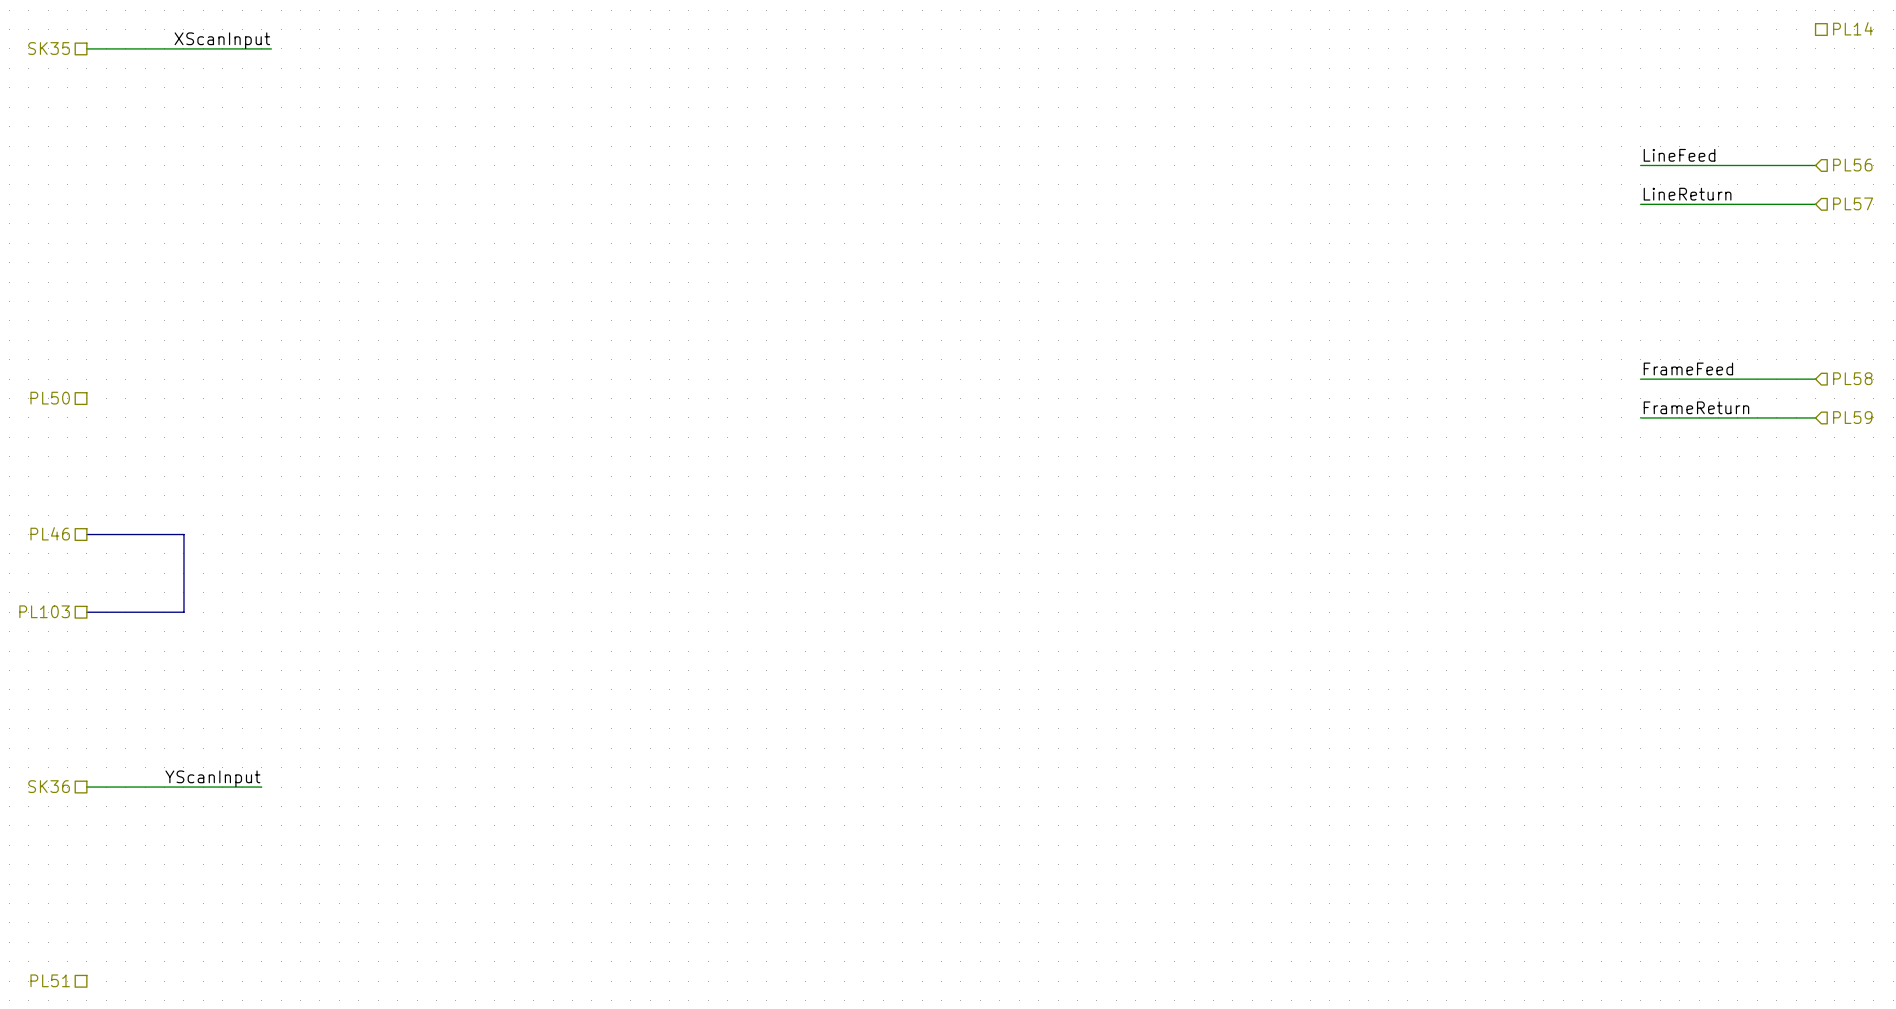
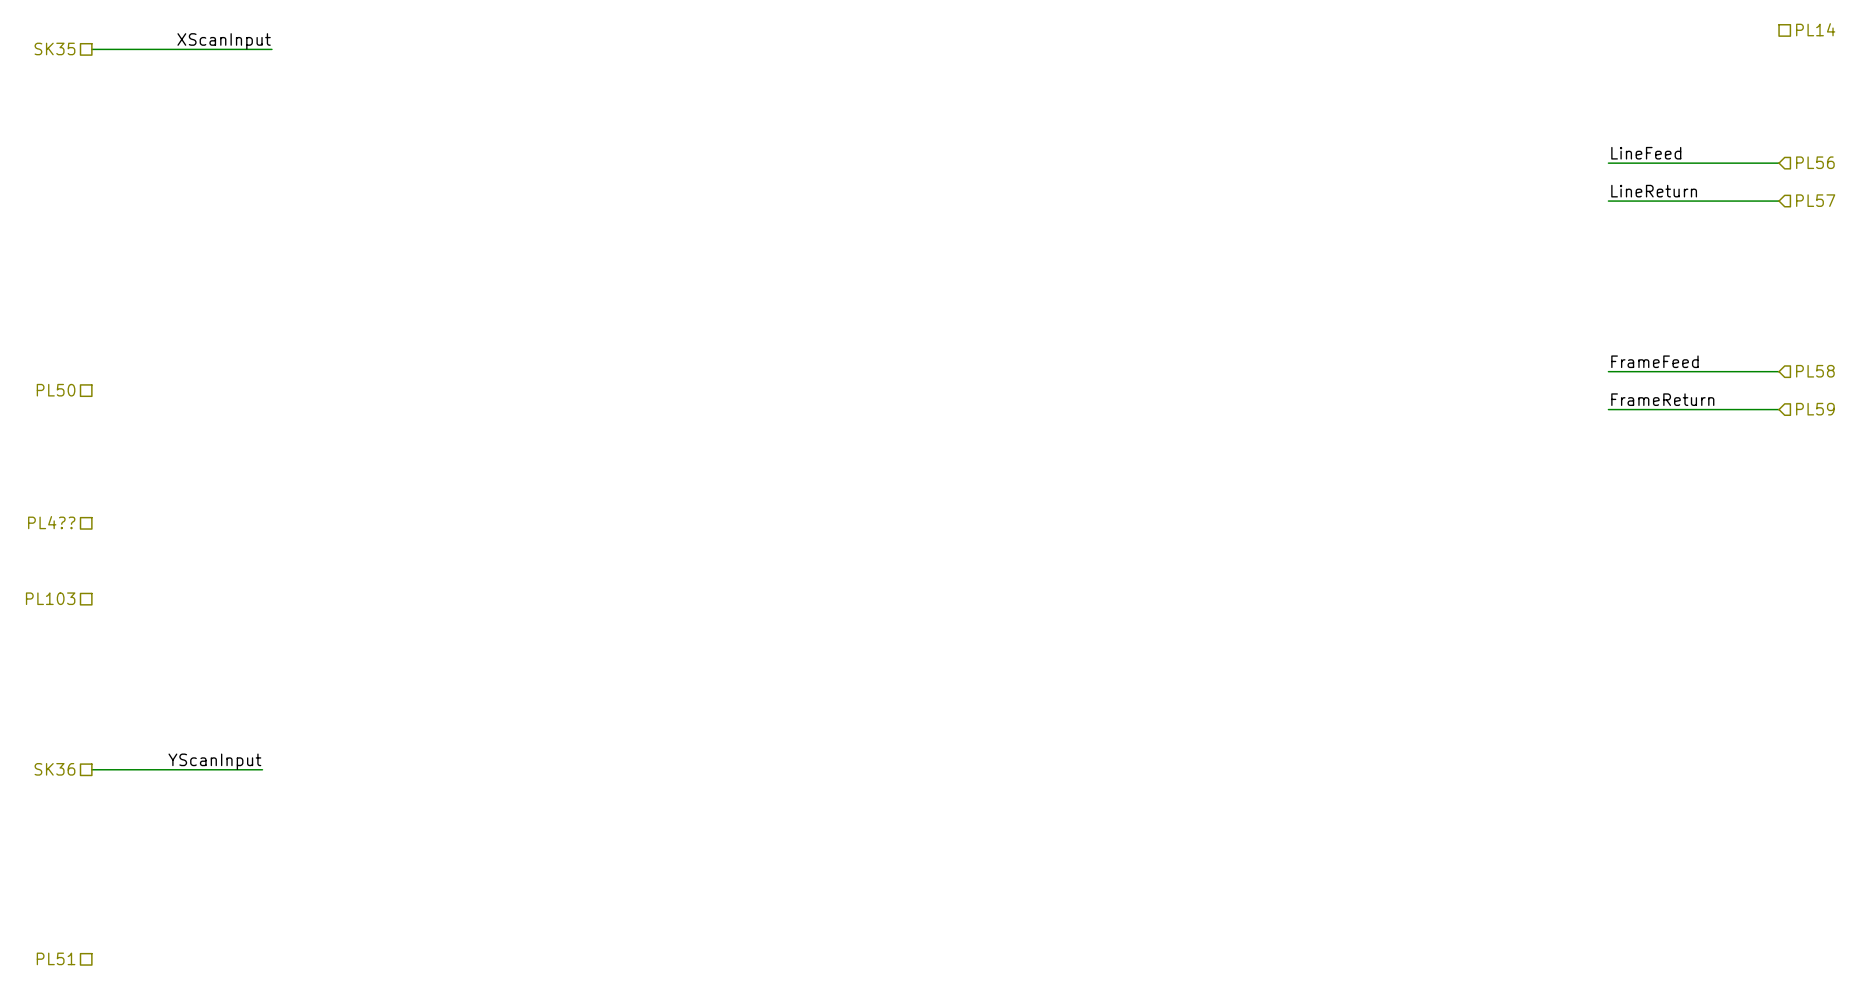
hierarchical label: PL46 (50, 533) -> PL4?? (51, 522)
bus: (86, 534) (183, 534) (183, 612) (86, 612) -> none

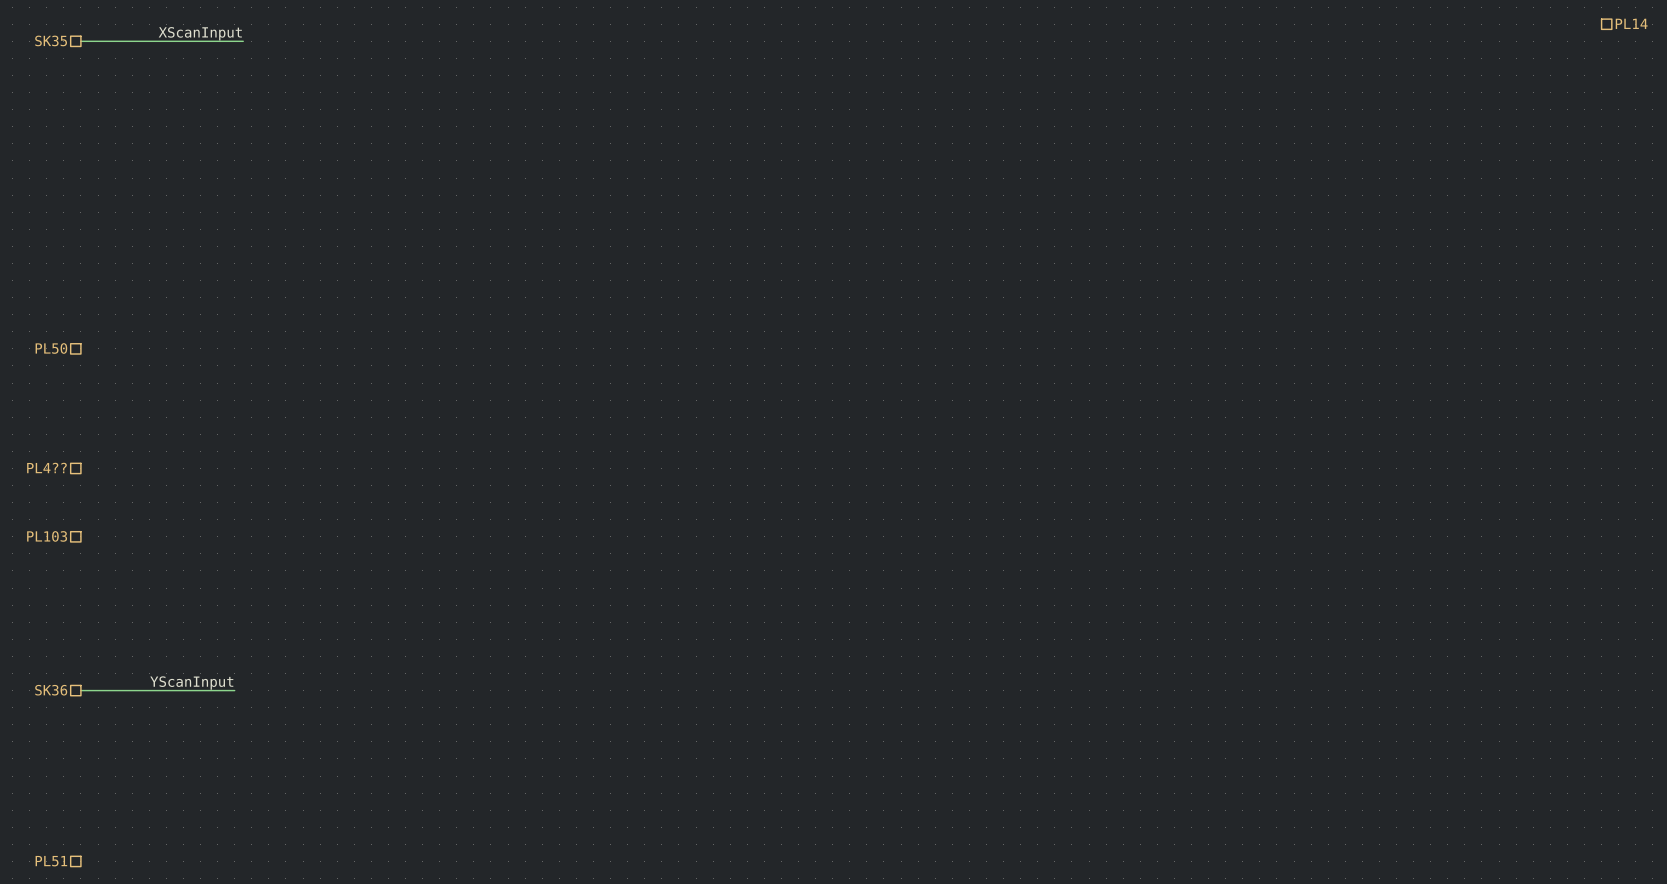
label: LineFeed (1646, 153) -> none
hierarchical label: PL56 (1815, 162) -> none
wire: (1608, 163) (1779, 163) -> none
label: LineReturn (1654, 191) -> none
hierarchical label: PL57 (1815, 200) -> none
wire: (1608, 201) (1779, 201) -> none
label: FrameFeed (1654, 361) -> none
wire: (1608, 371) (1779, 371) -> none
hierarchical label: PL58 (1815, 371) -> none
label: FrameReturn (1662, 399) -> none
wire: (1608, 409) (1779, 409) -> none
hierarchical label: PL59 (1815, 409) -> none

